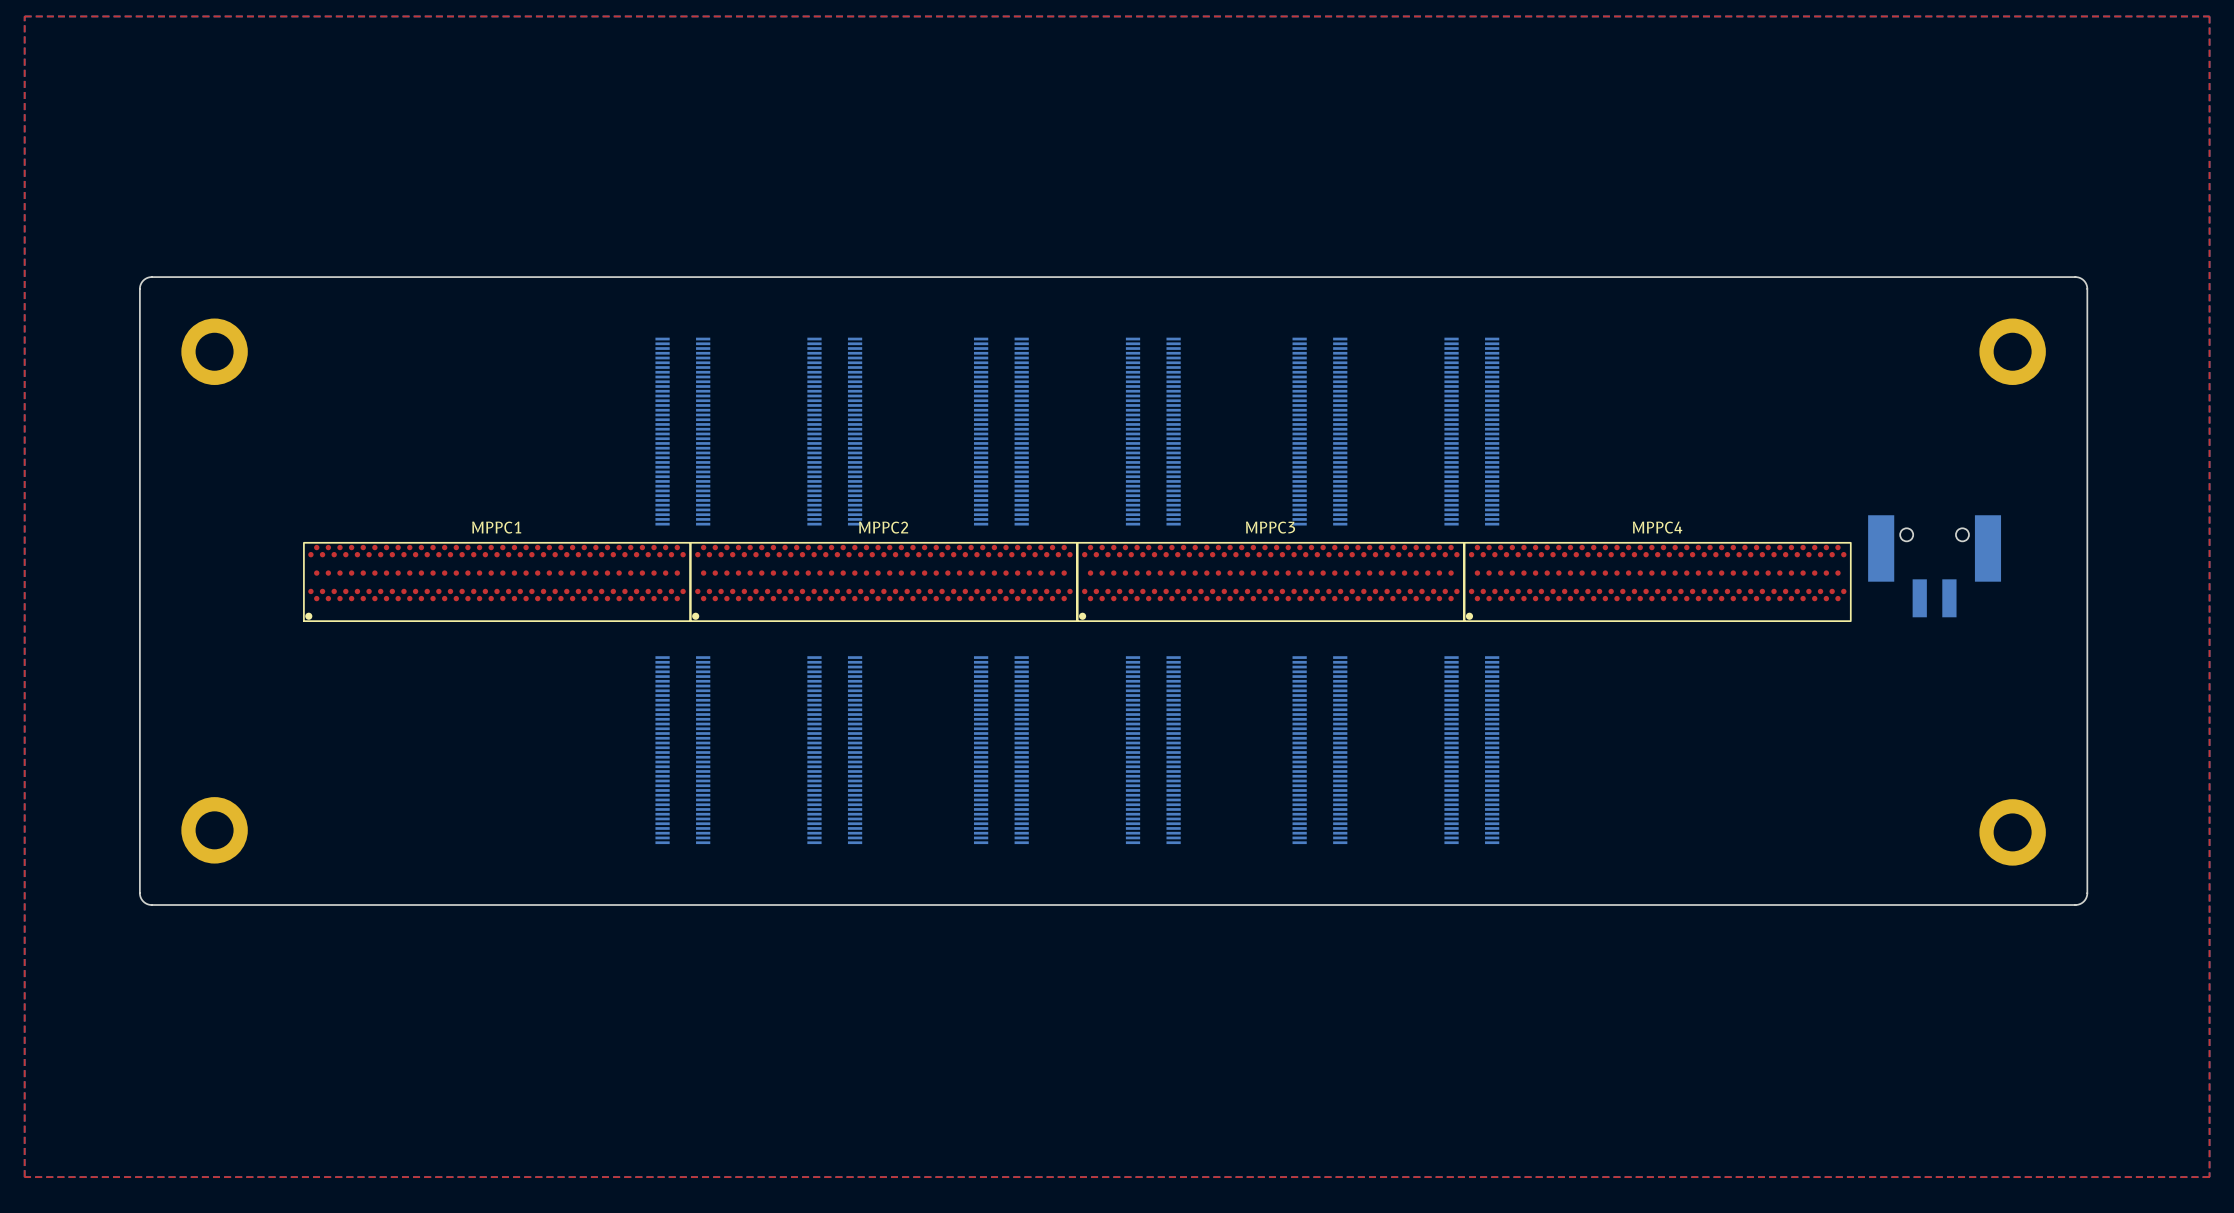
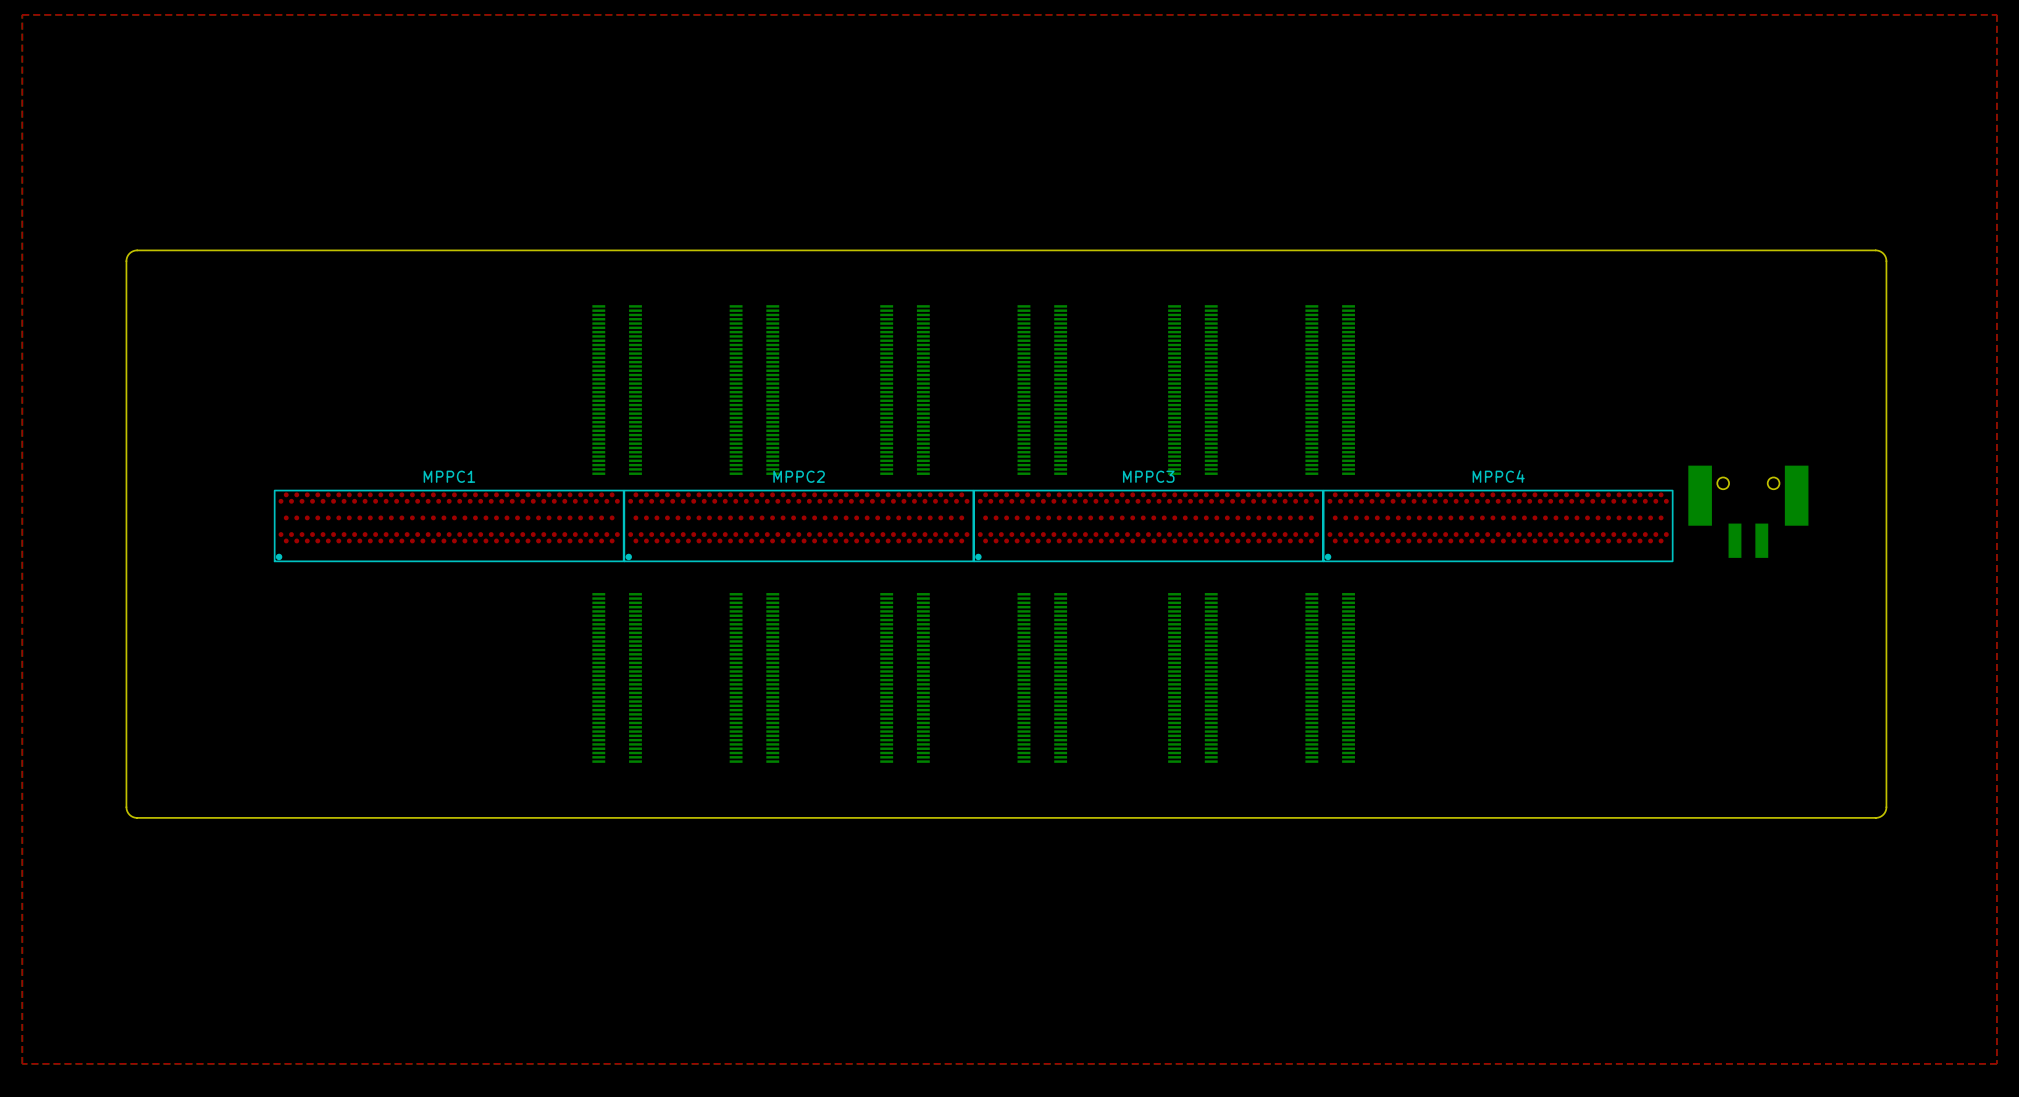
part: (214, 351) -> none
part: (2012, 351) -> none
part: (214, 830) -> none
part: (2012, 832) -> none

